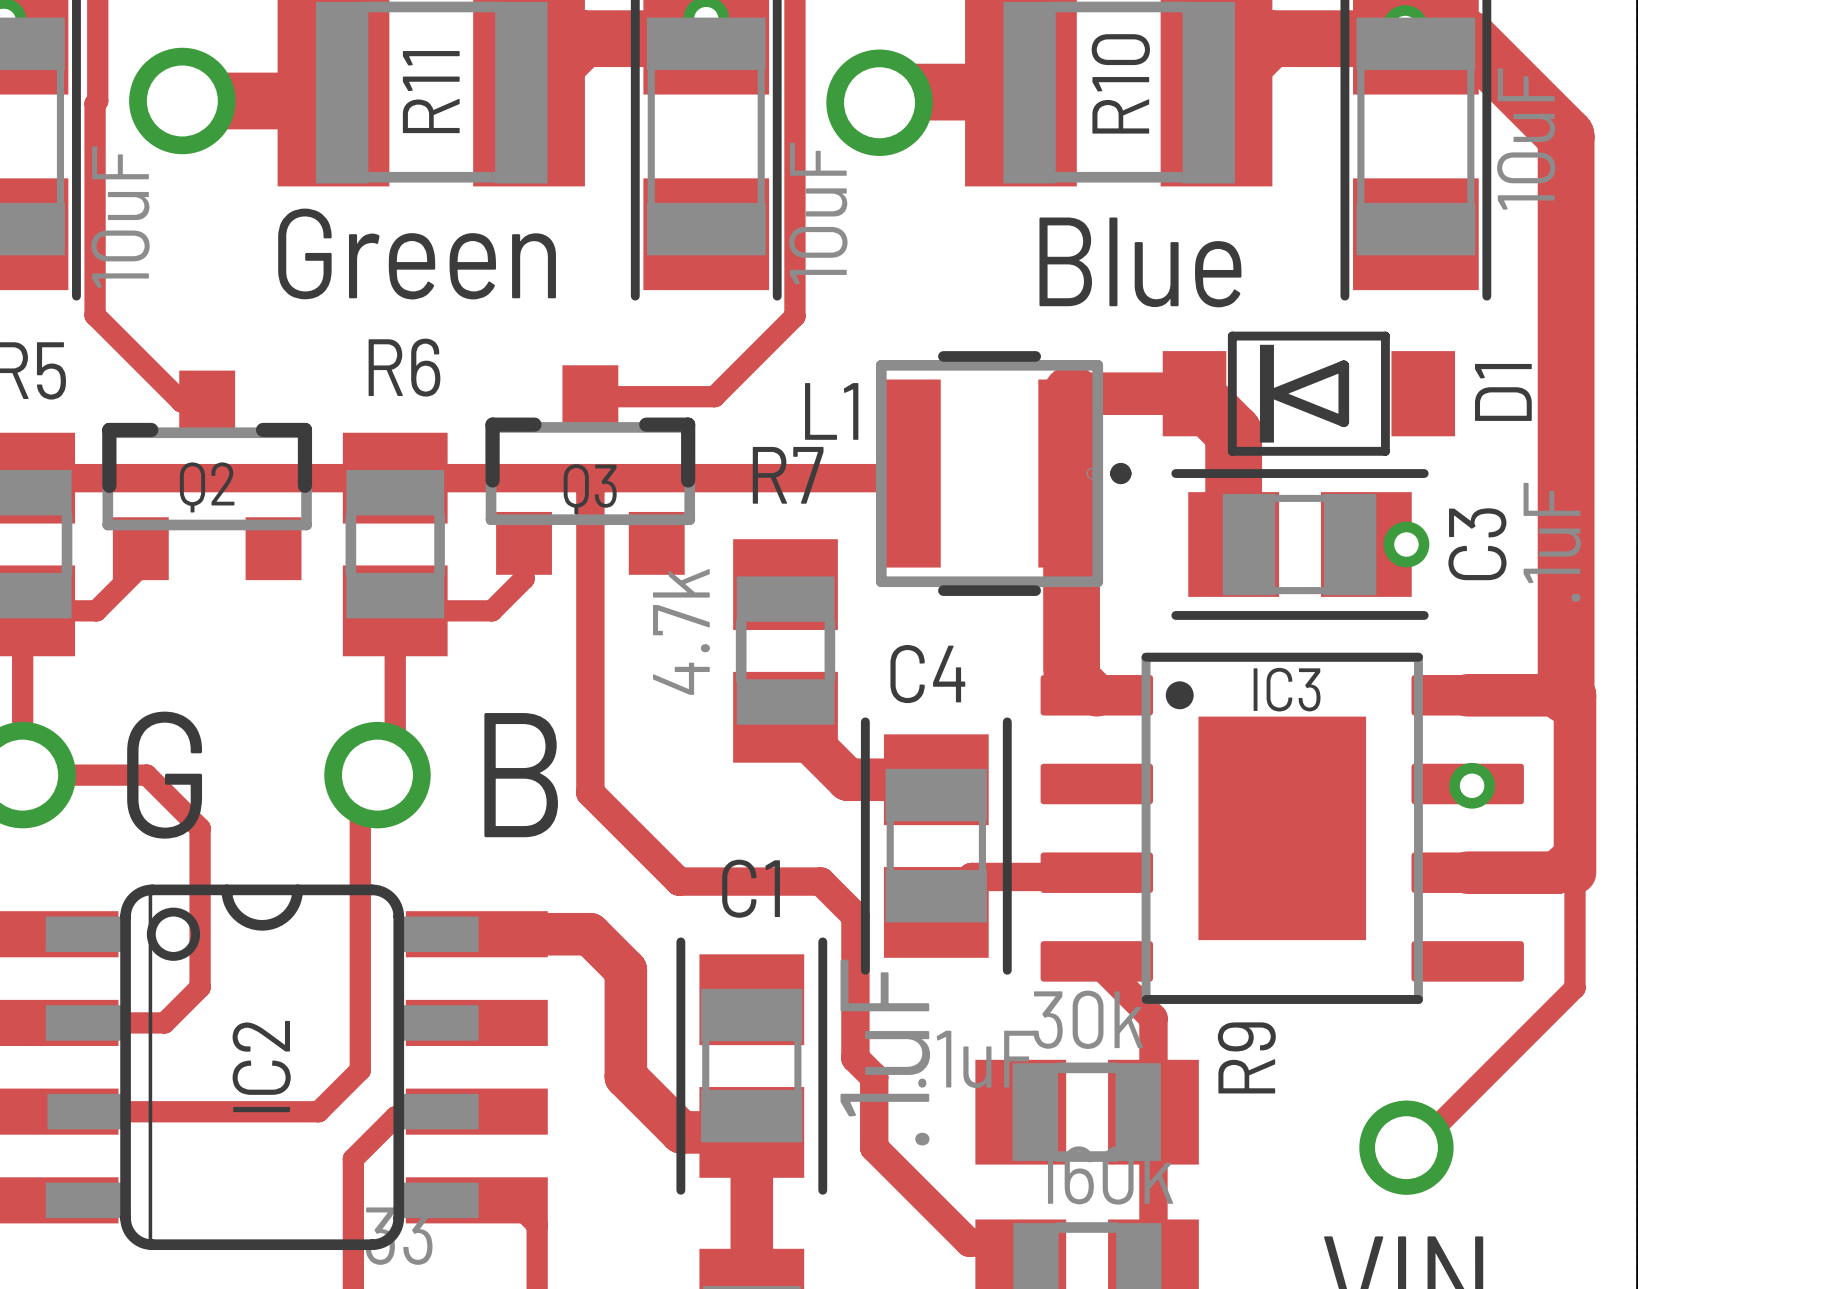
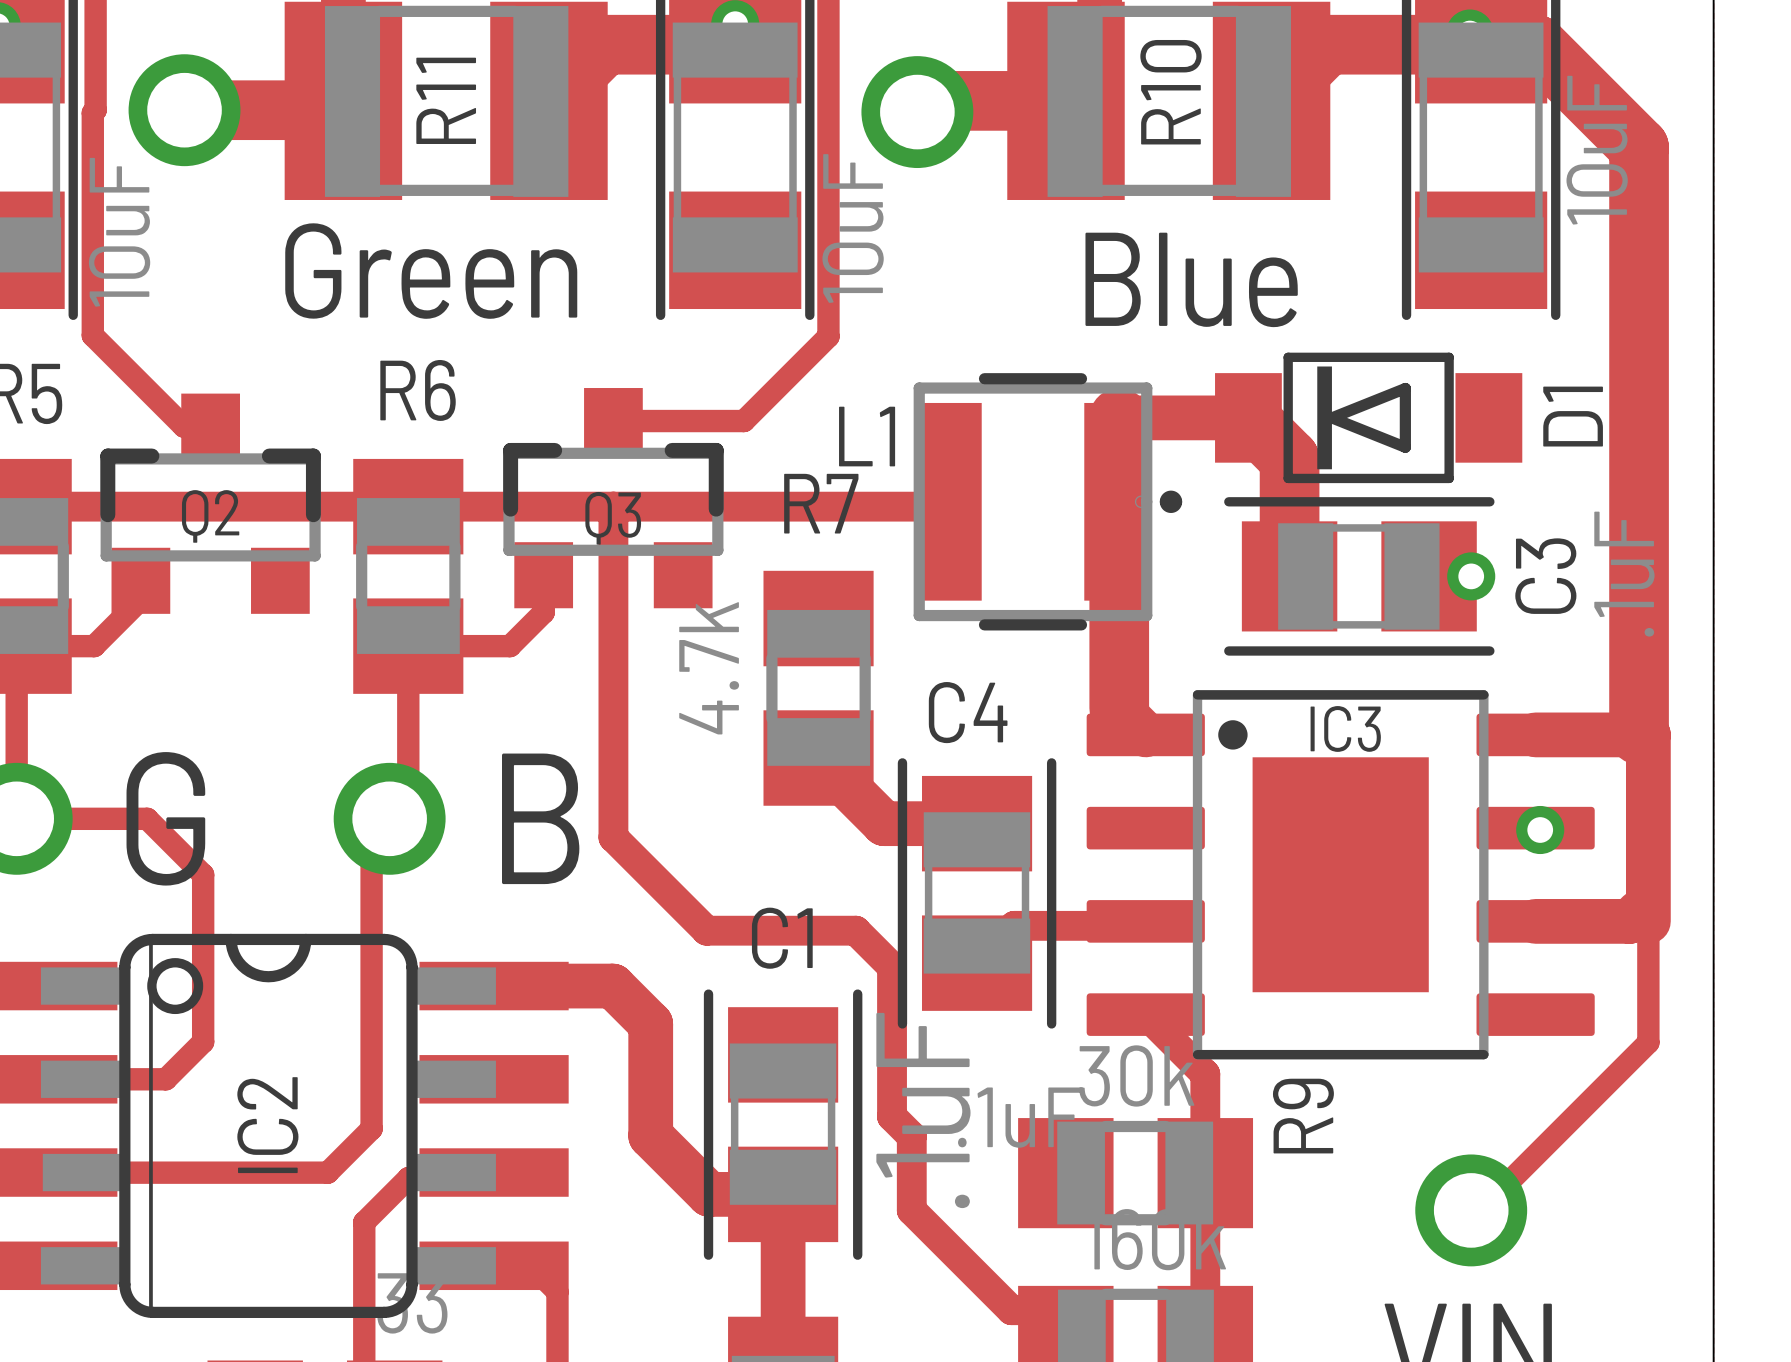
part footprint: [1359, 1100, 1454, 1195] -> [1415, 1154, 1528, 1267]

